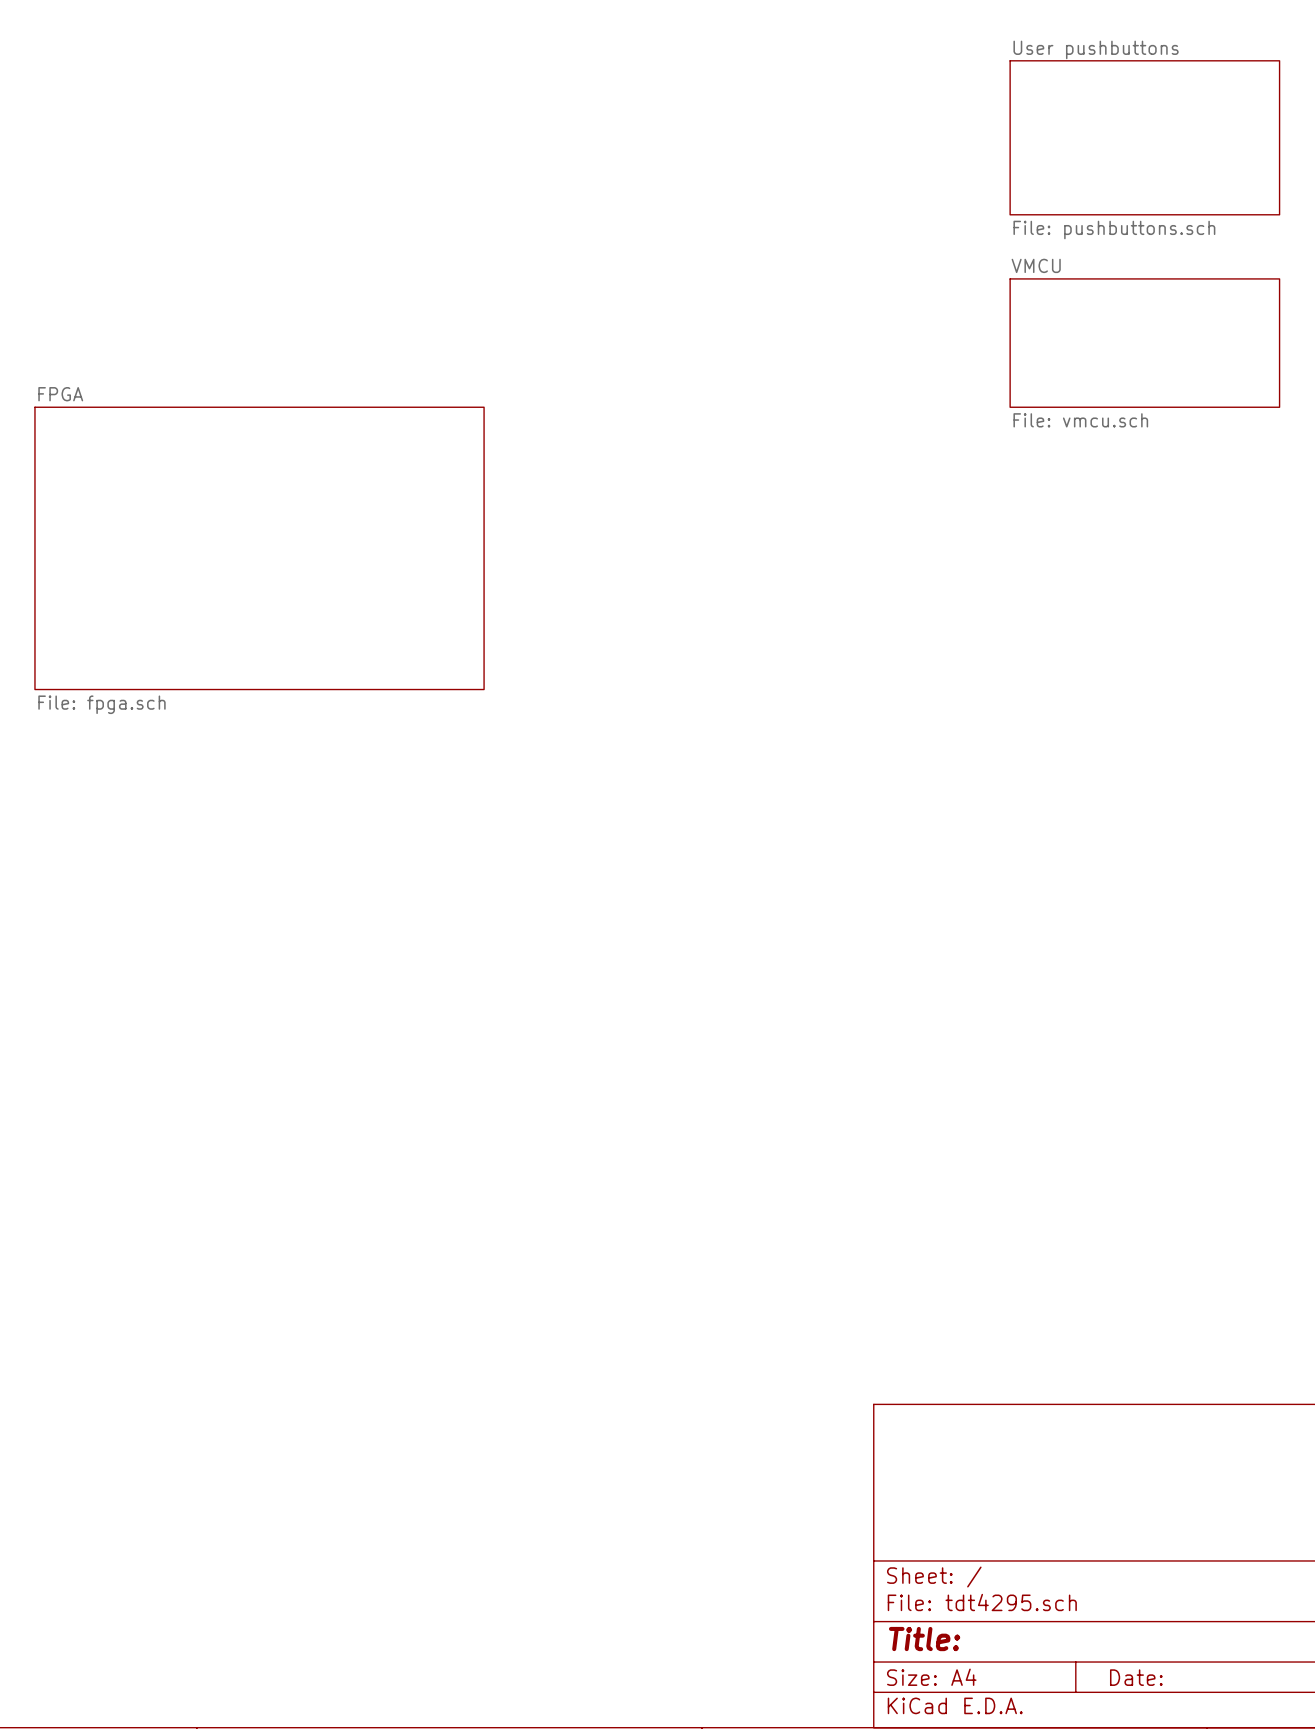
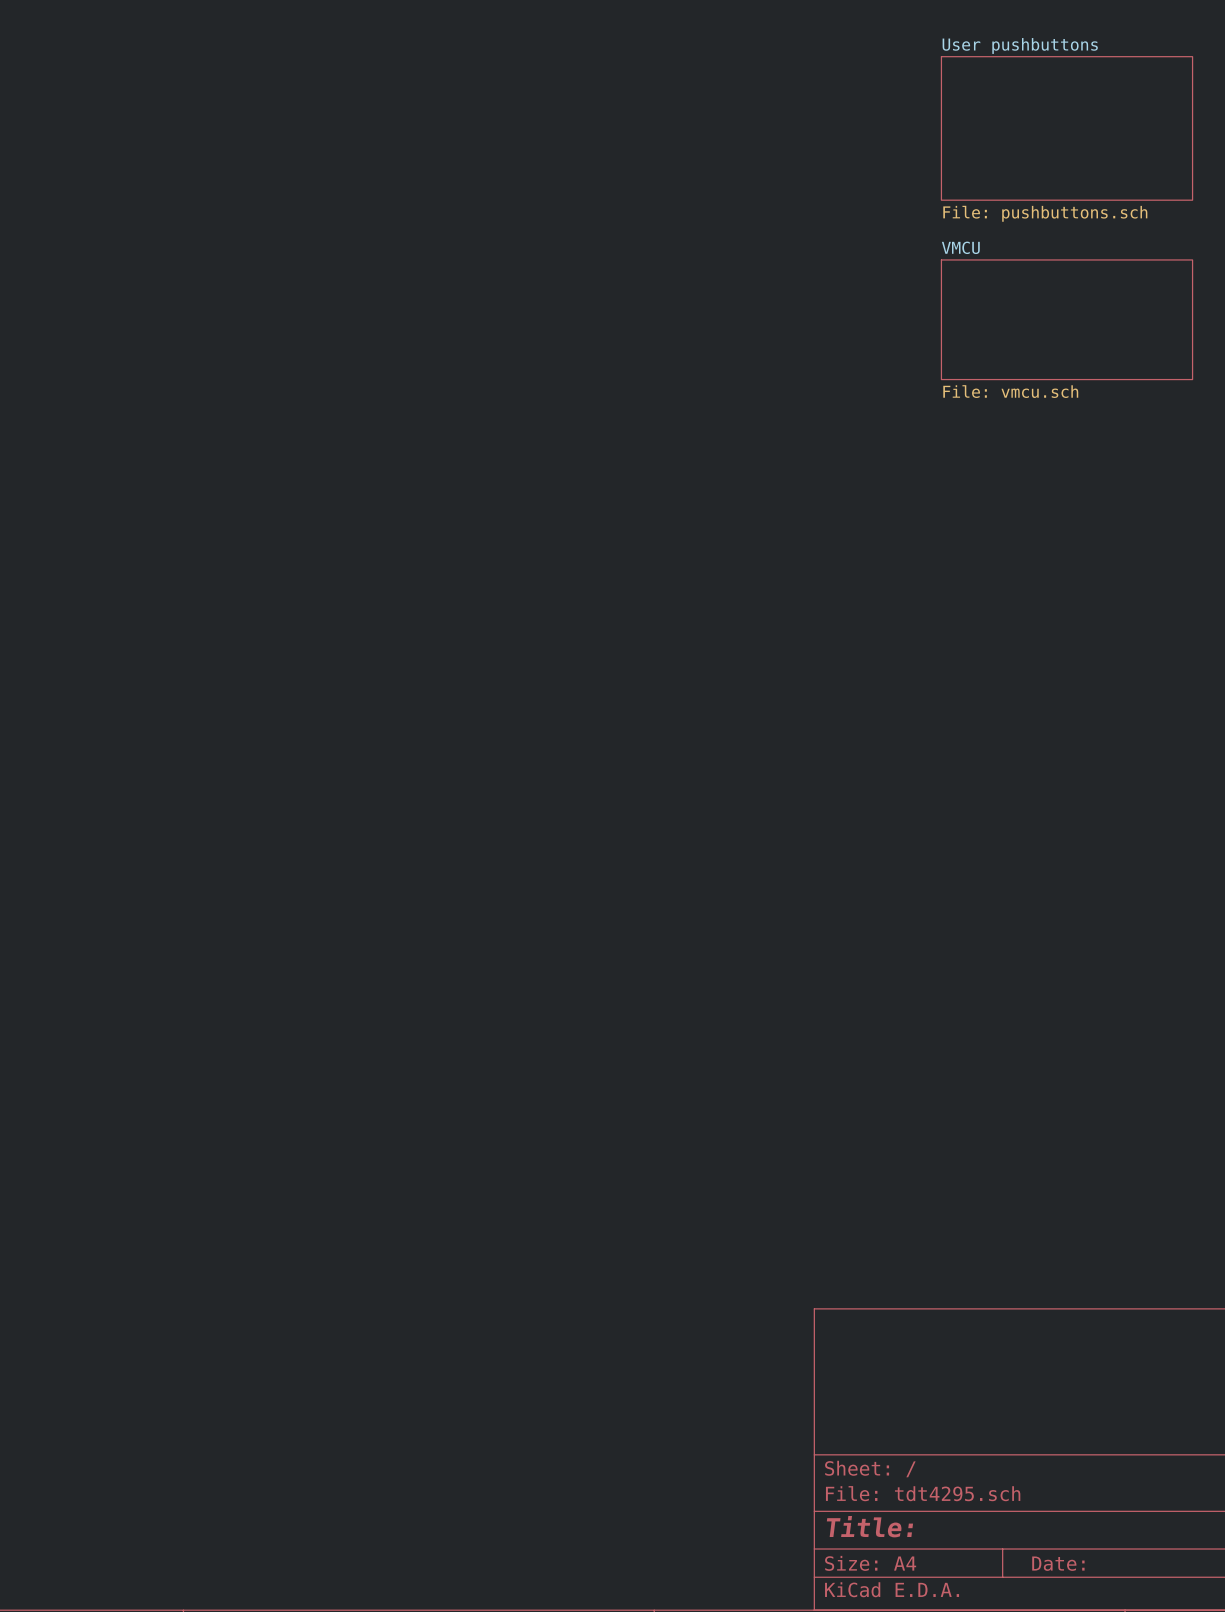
sheet FPGA: File: fpga.sch (259, 548) -> none

